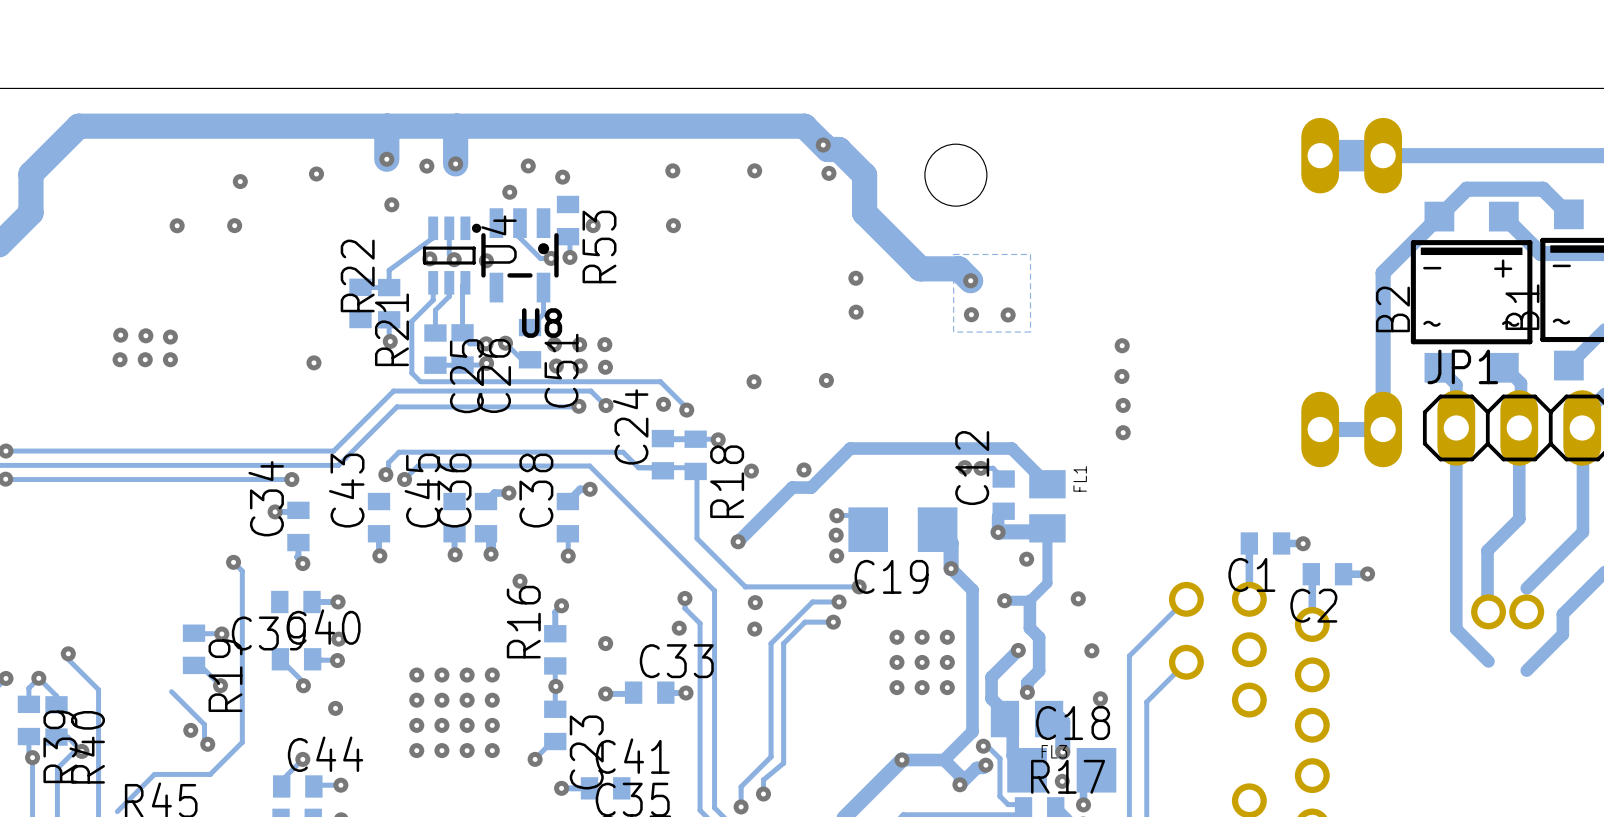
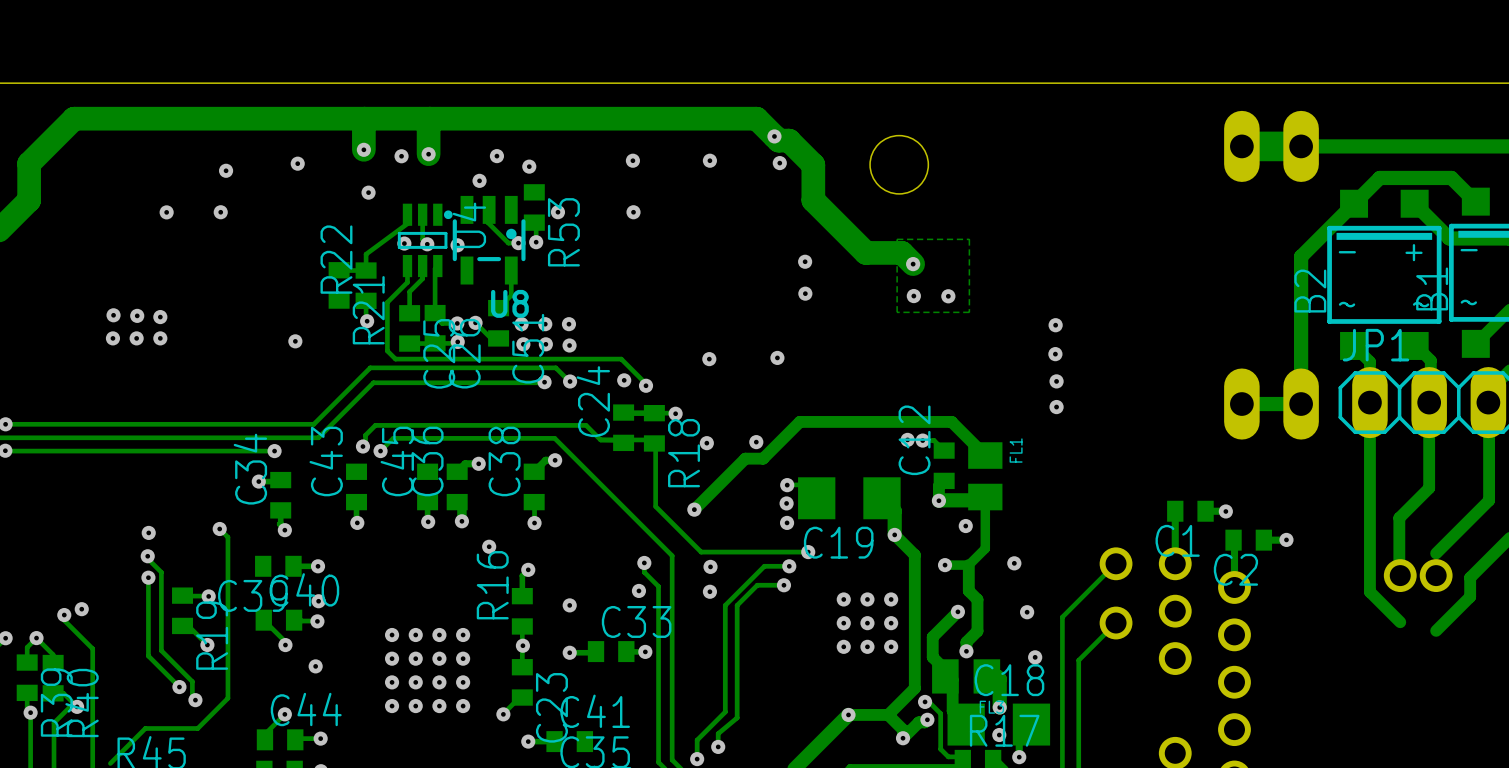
via: none -> (148, 532)
track: none -> (147, 556) (147, 558) (161, 572) (161, 650)
via: none -> (147, 556)
track: none -> (148, 577) (148, 656) (179, 687)
via: none -> (148, 577)
via: none -> (81, 609)

